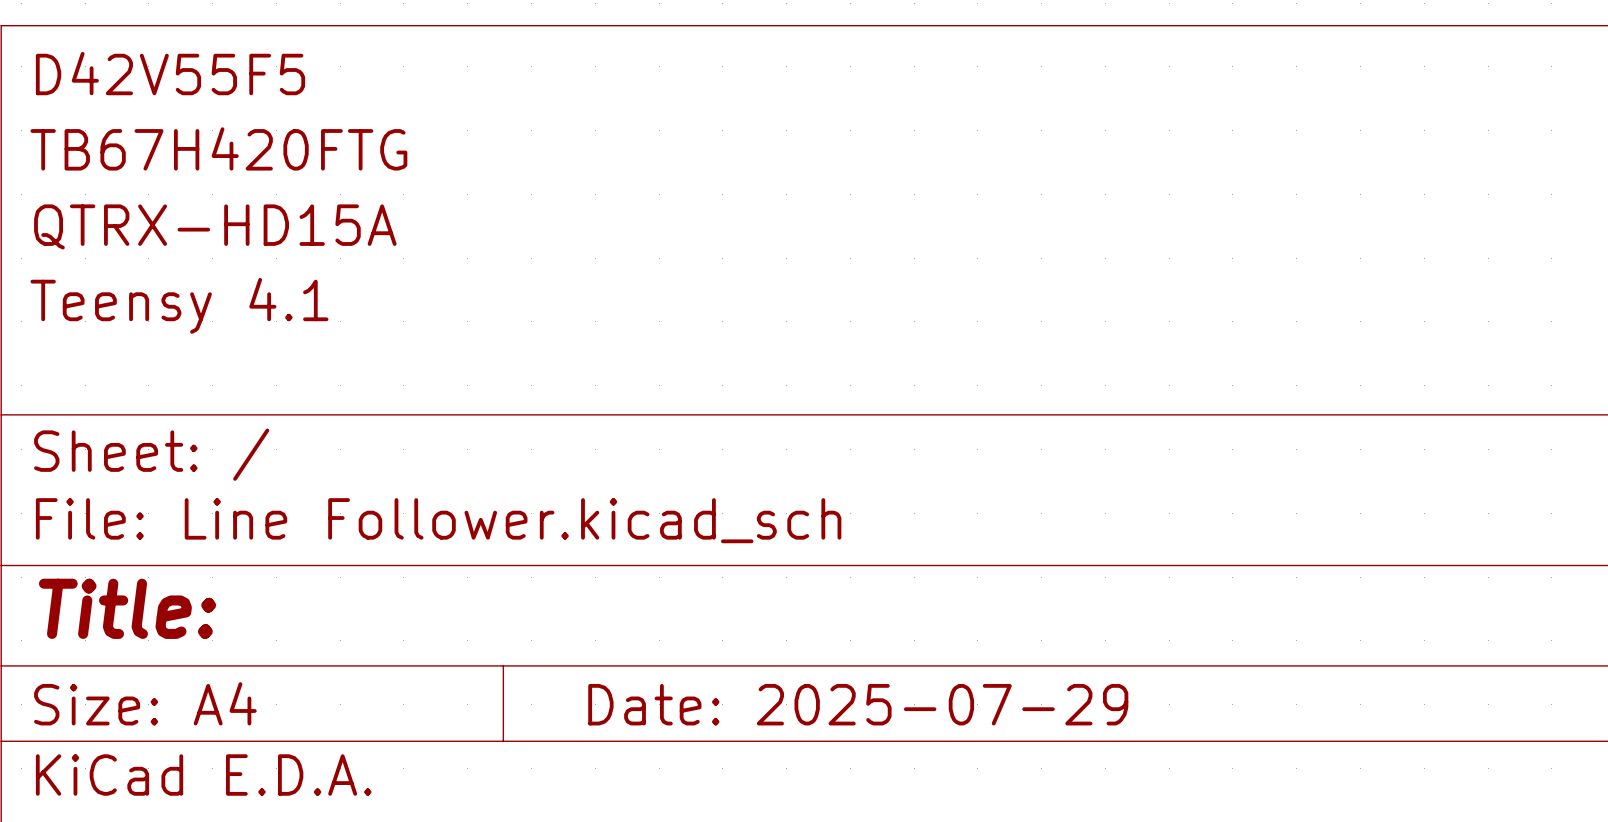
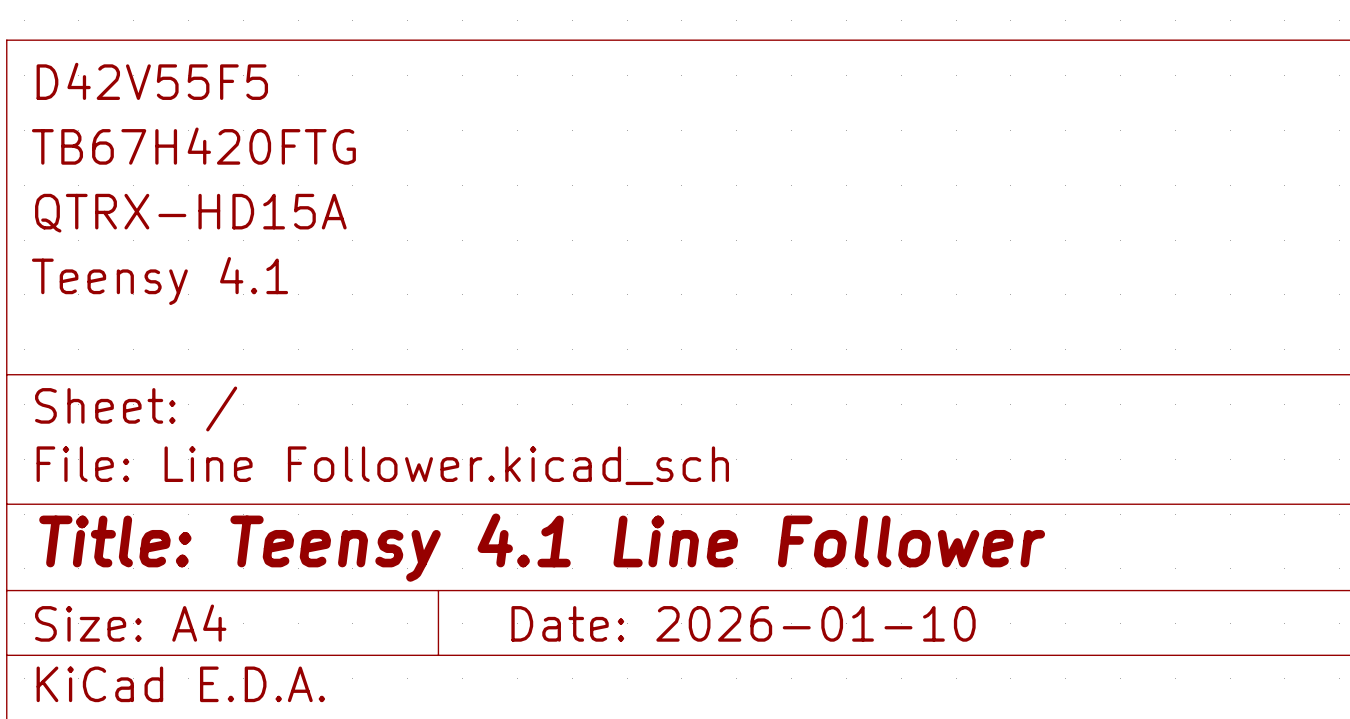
title block: Title: (127, 608) -> Title: Teensy 4.1 Line Follower (542, 547)
title block: Date: 2025-07-29 (858, 704) -> Date: 2026-01-10 (743, 623)

